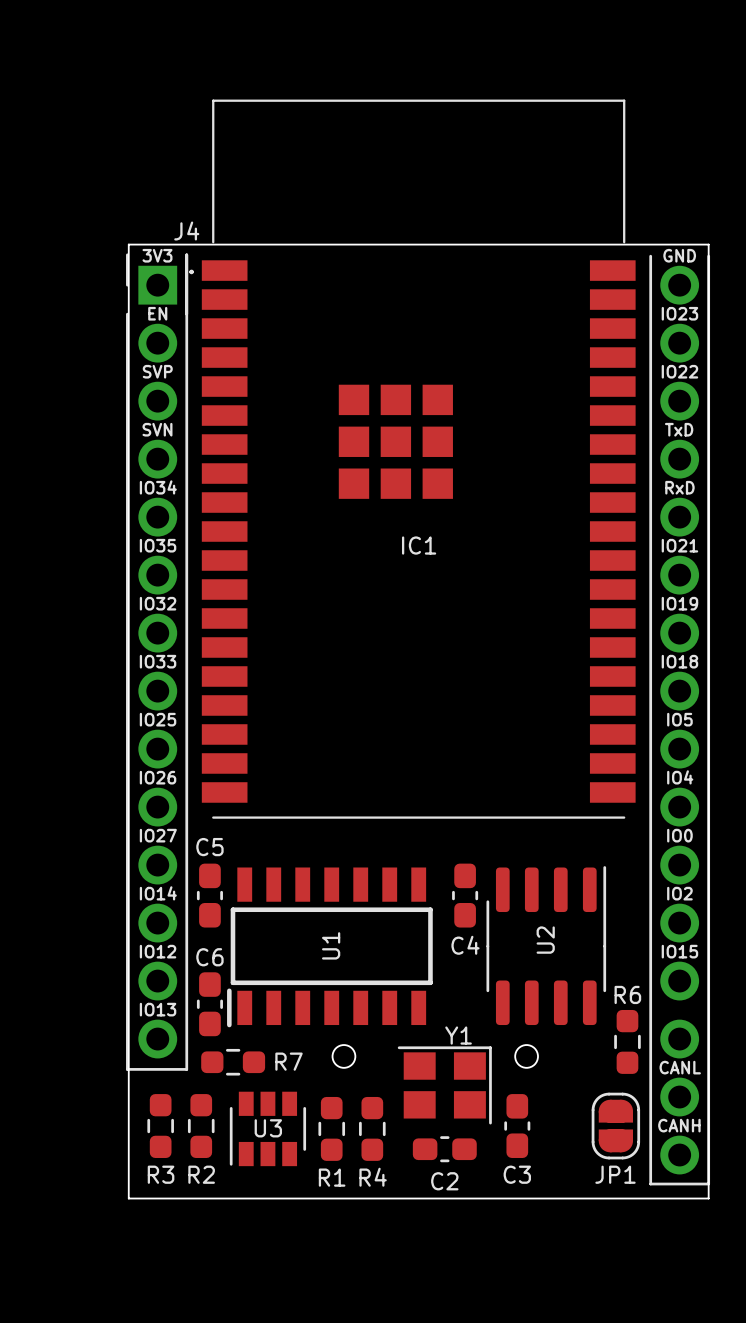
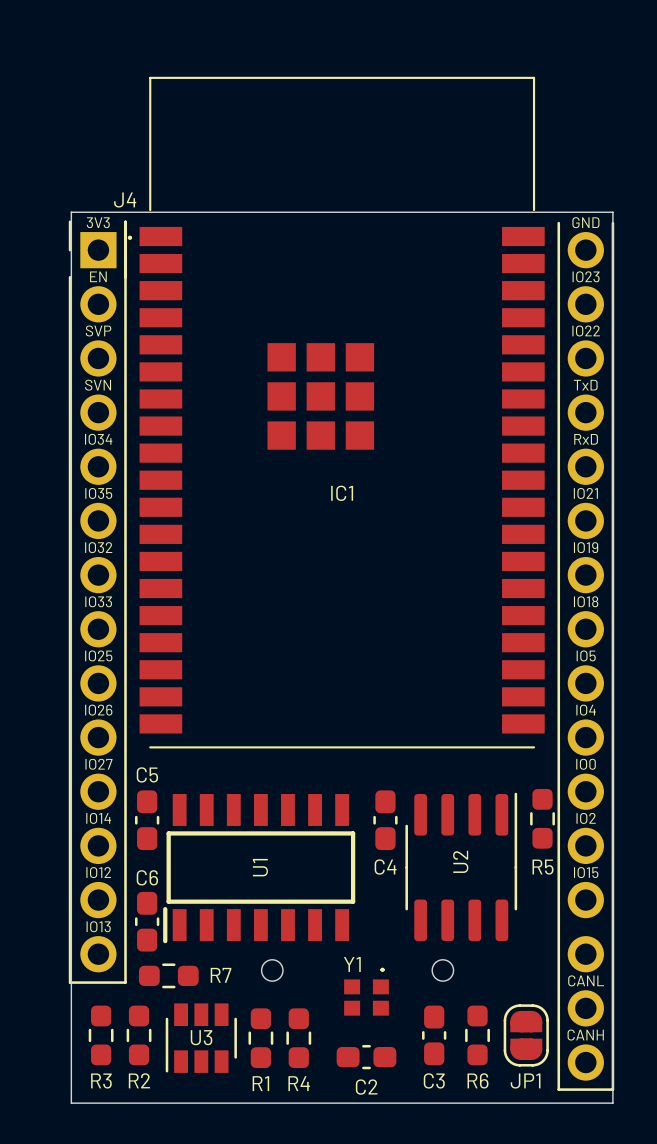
R5: none -> (542, 818)
R6 name position: R6 (627, 994) -> R6 (478, 1080)
R6 position: (627, 1041) -> (477, 1035)
Y1 footprint: [397, 1046, 492, 1125] -> [344, 967, 389, 1016]

